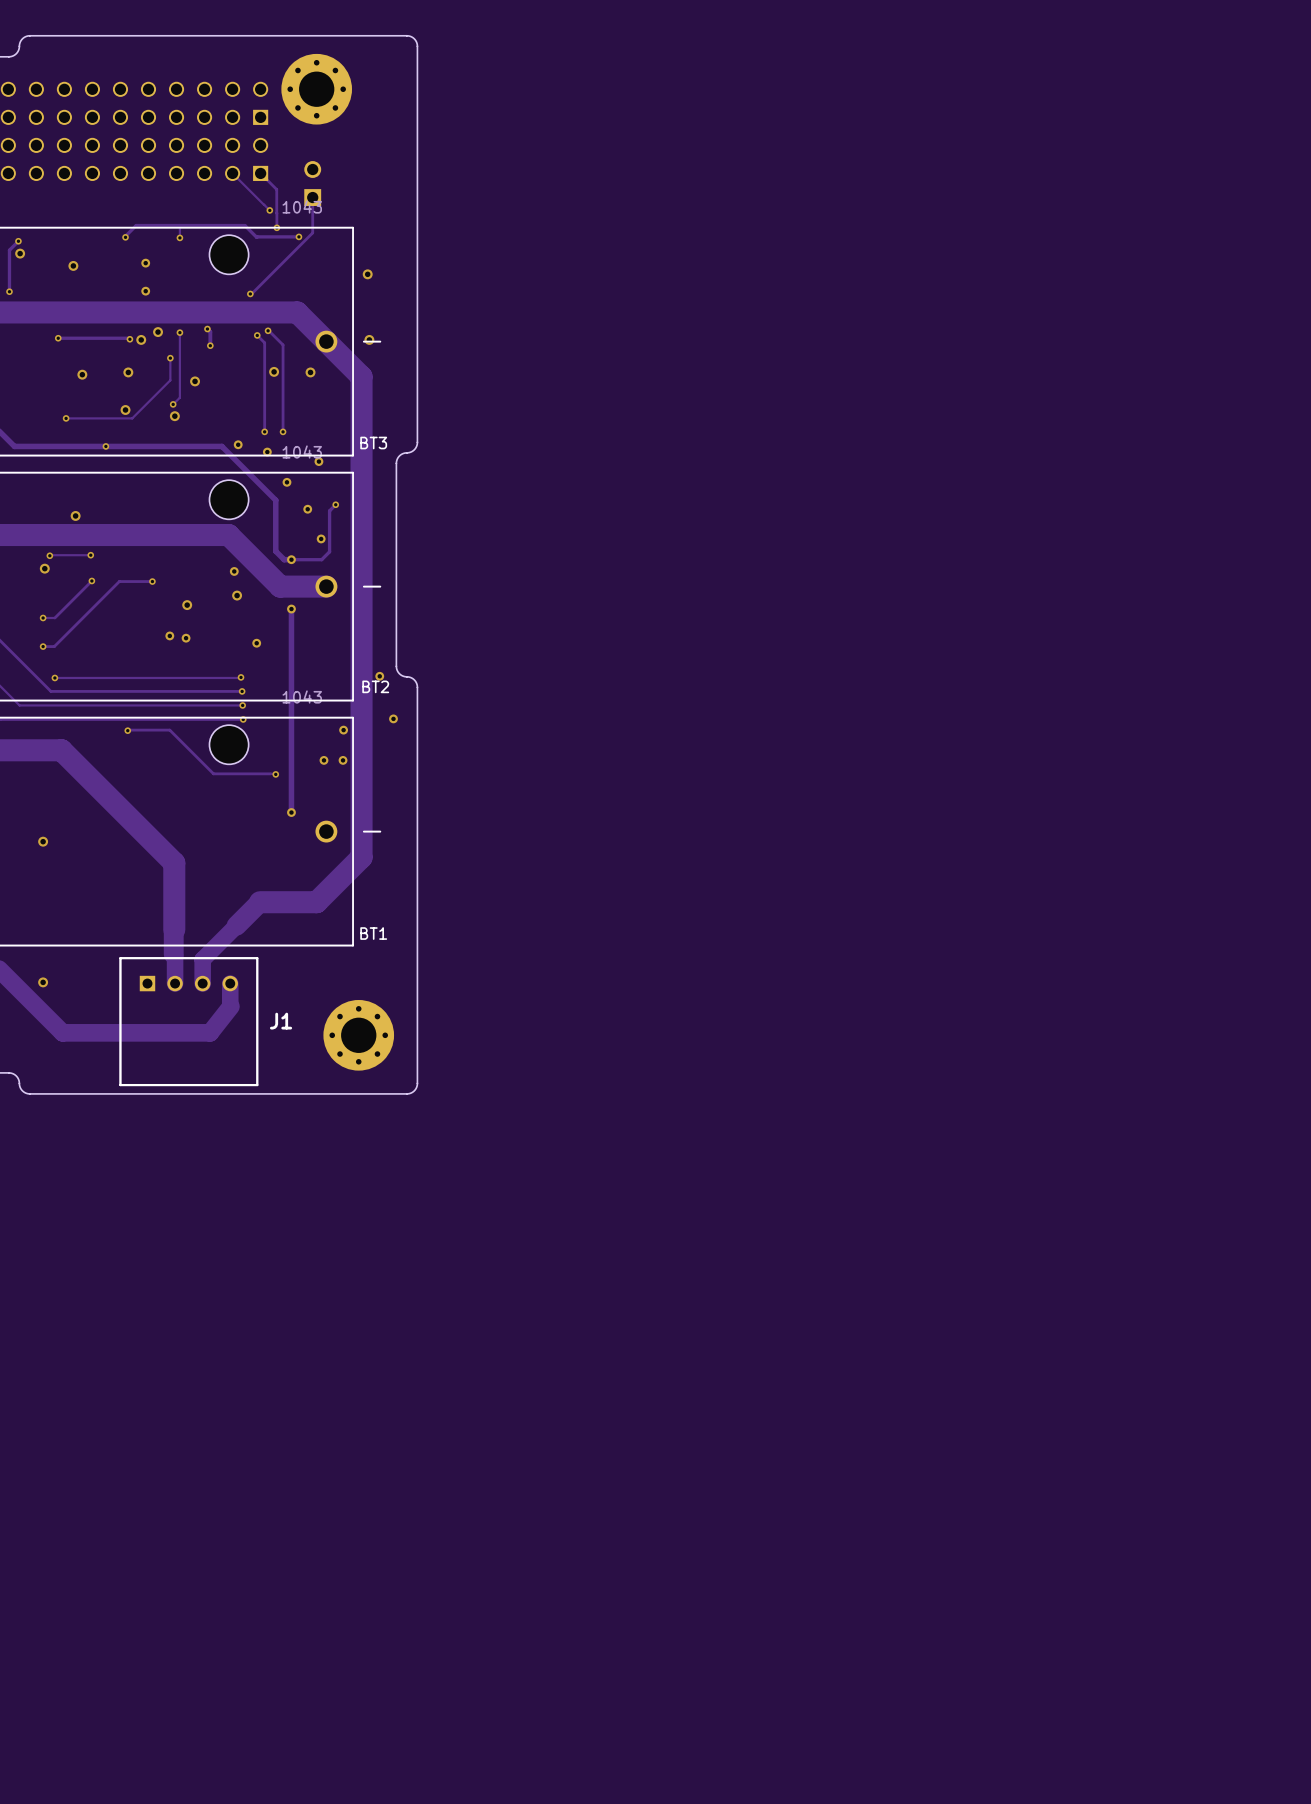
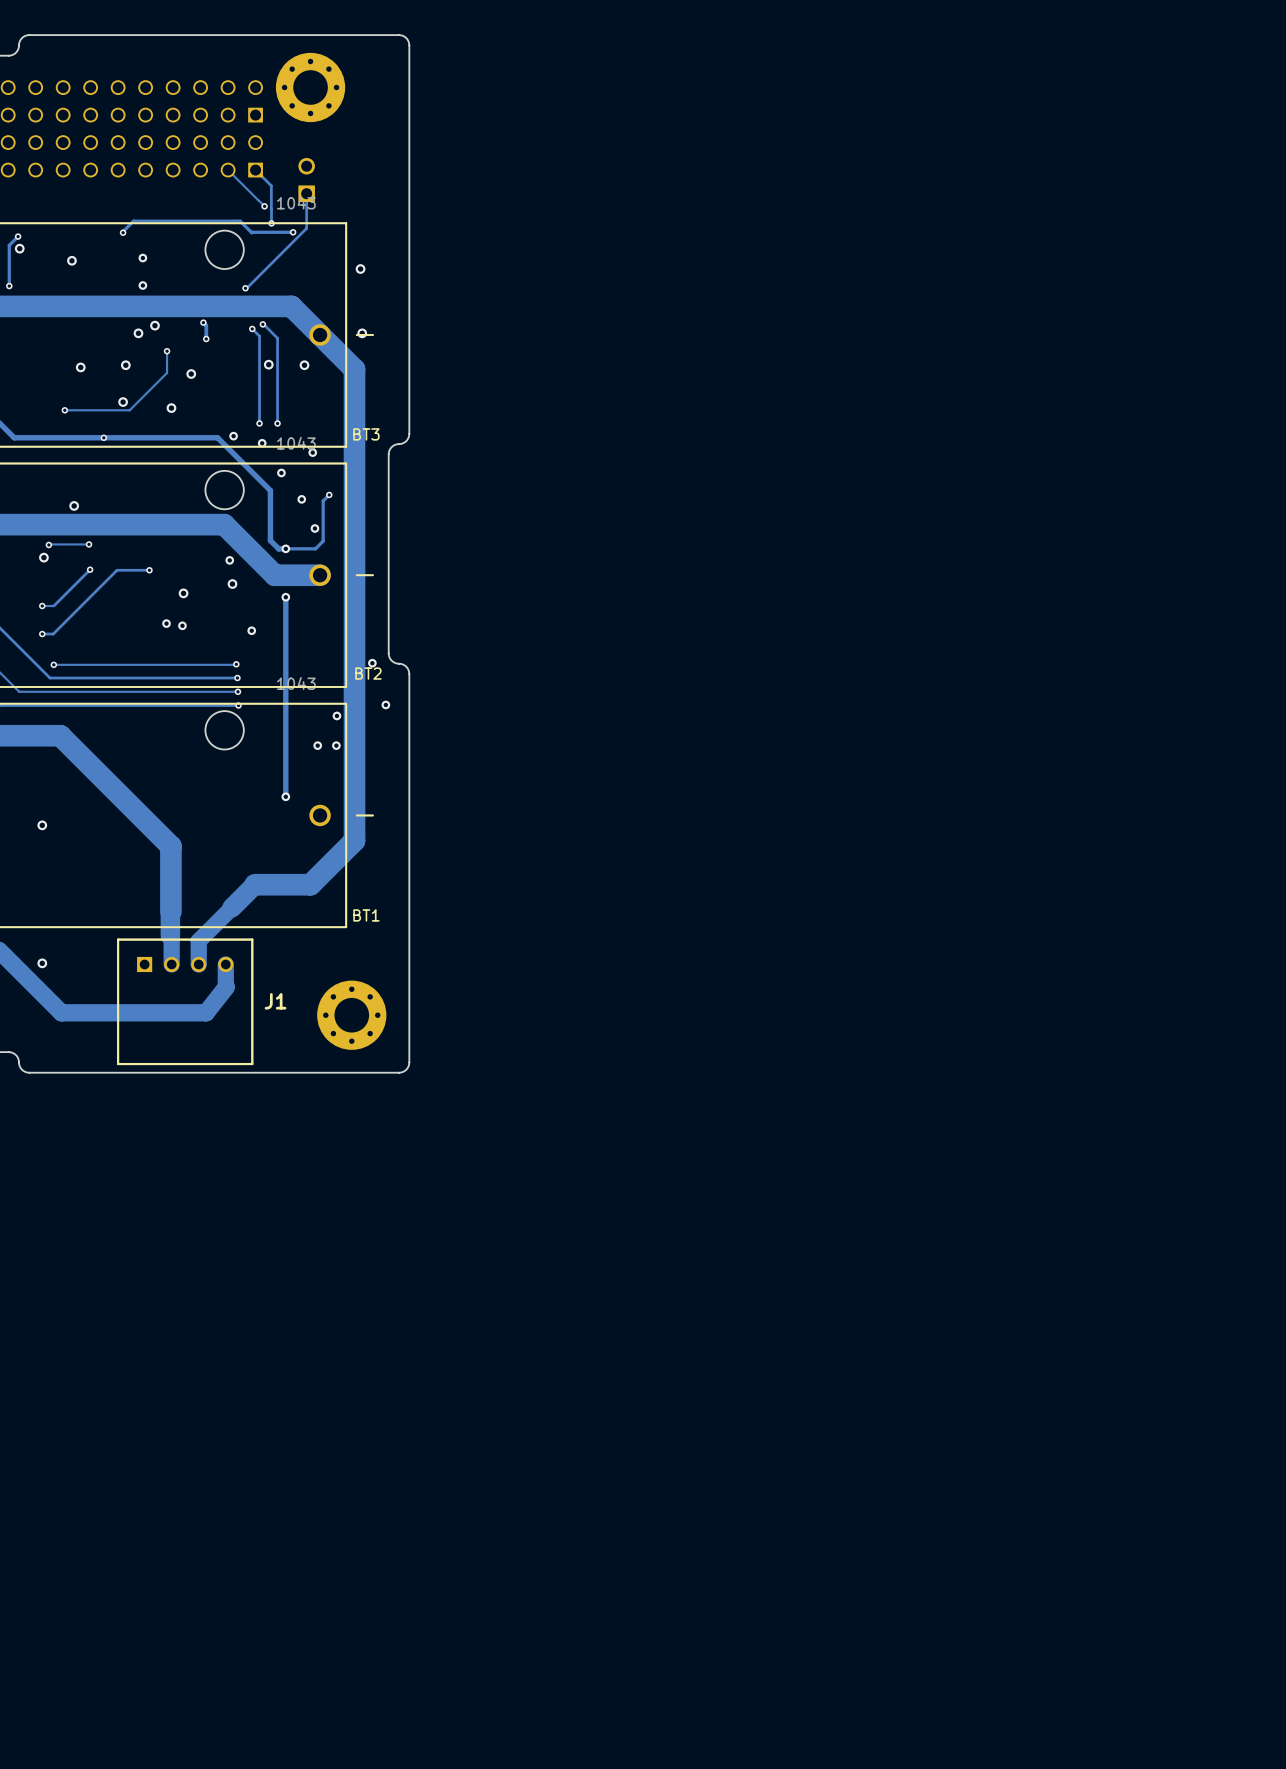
track: (179, 225) (179, 237) -> none
via: (179, 237) -> none
track: (179, 332) (179, 397) (173, 404) -> none
via: (179, 332) -> none
track: (58, 338) (129, 339) -> none
via: (58, 338) -> none
via: (129, 339) -> none
via: (173, 404) -> none
track: (127, 730) (169, 730) (213, 773) (275, 774) -> none
via: (127, 730) -> none
via: (275, 774) -> none

